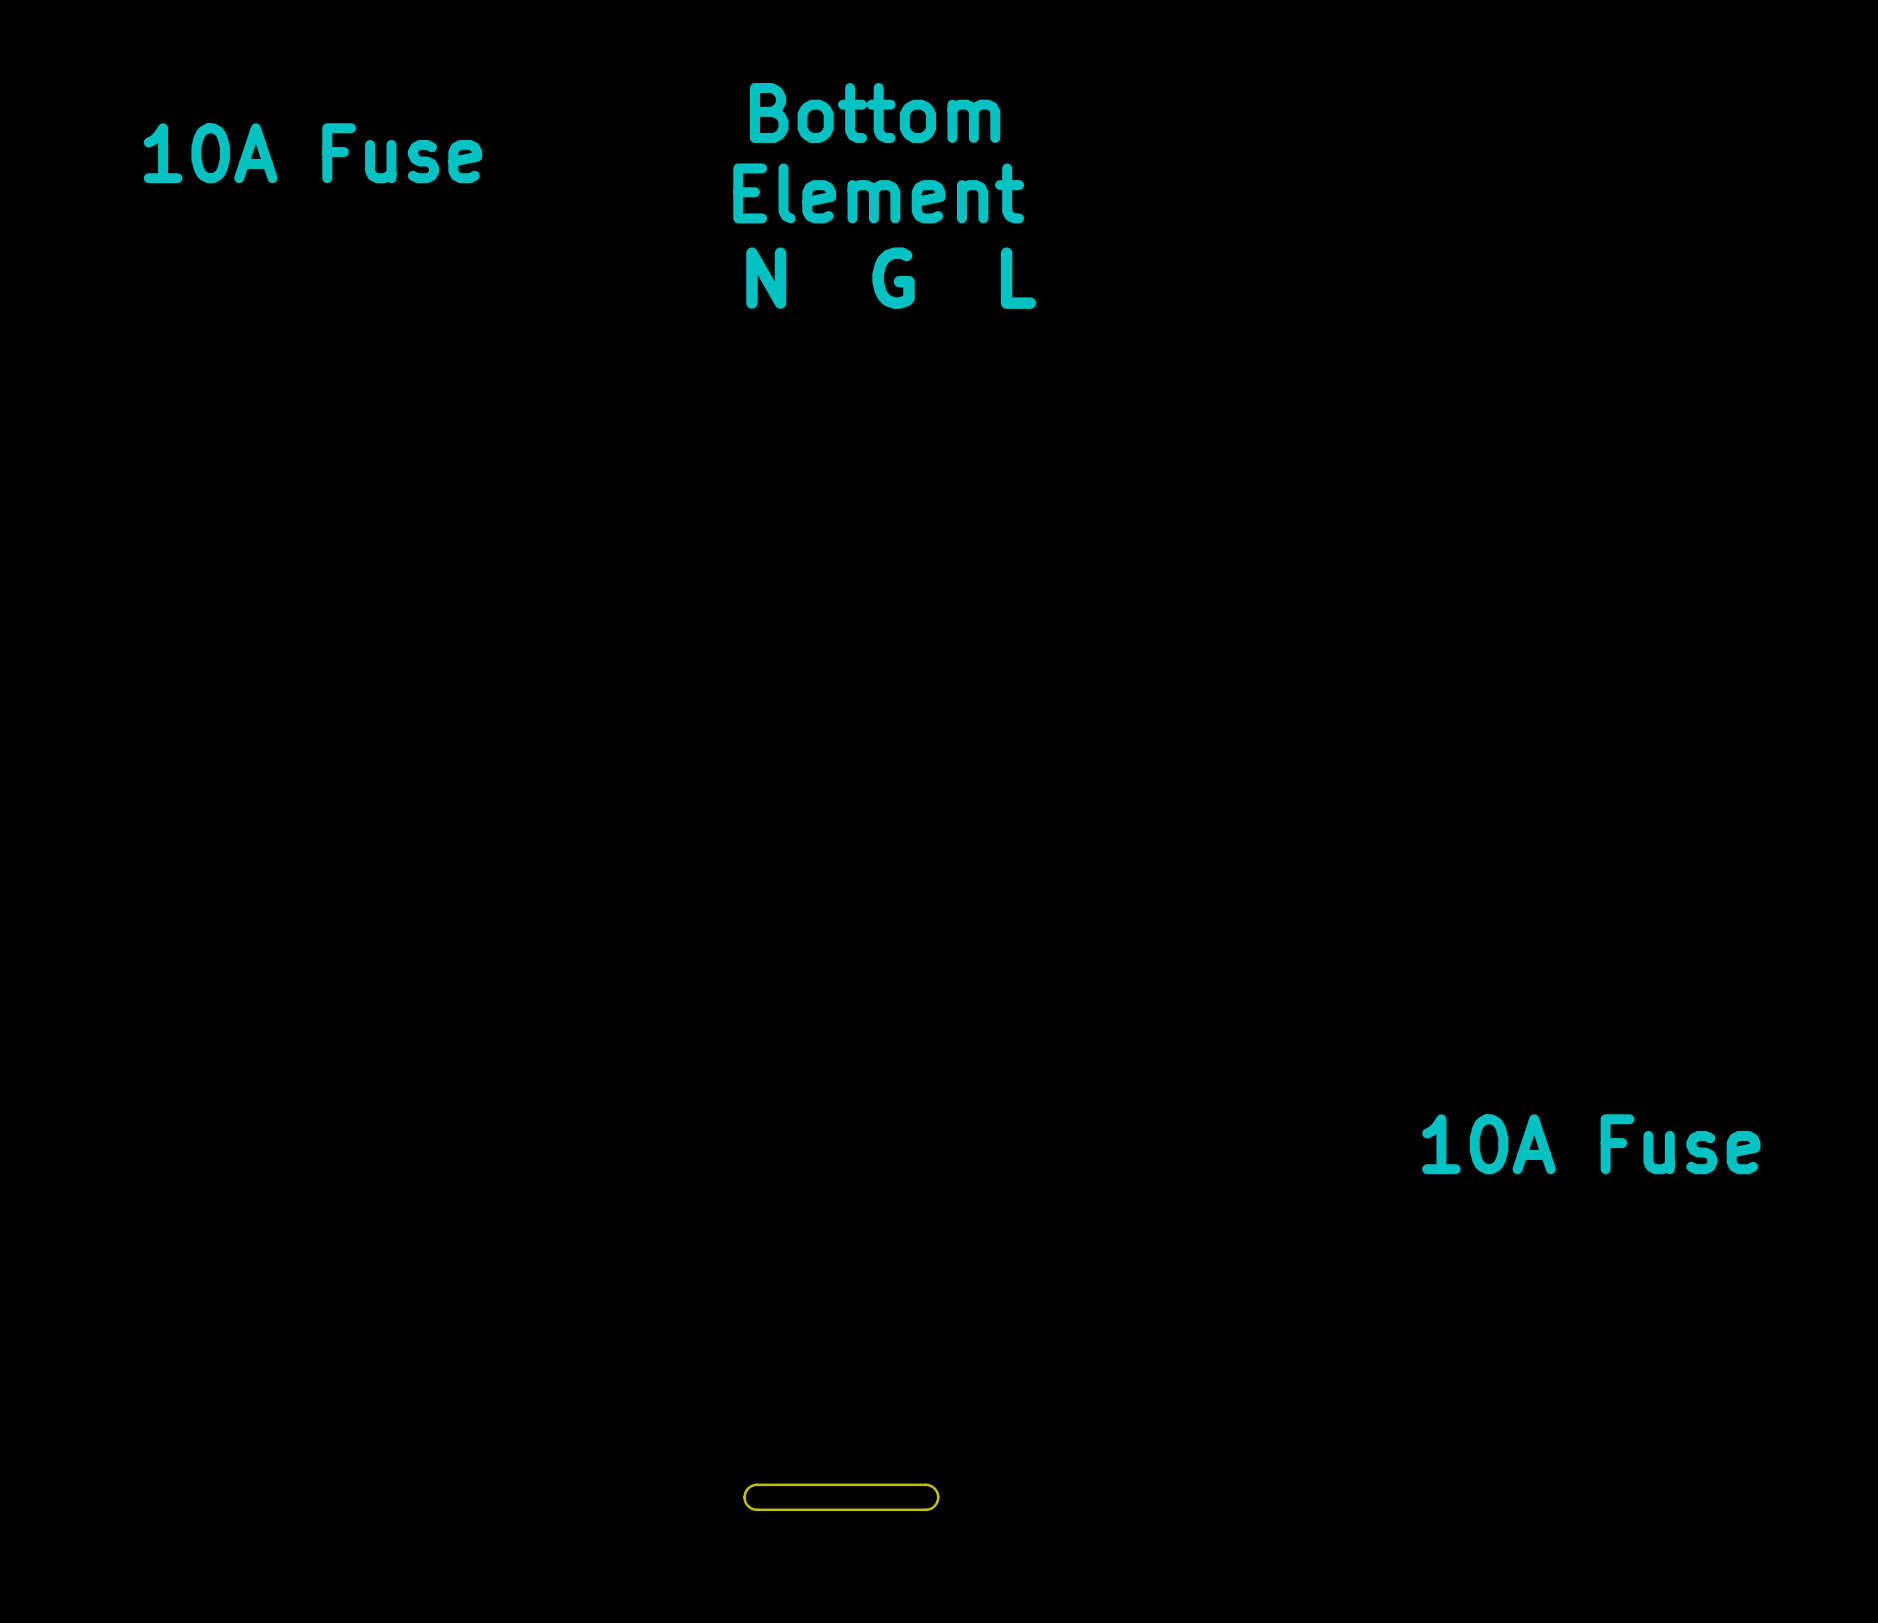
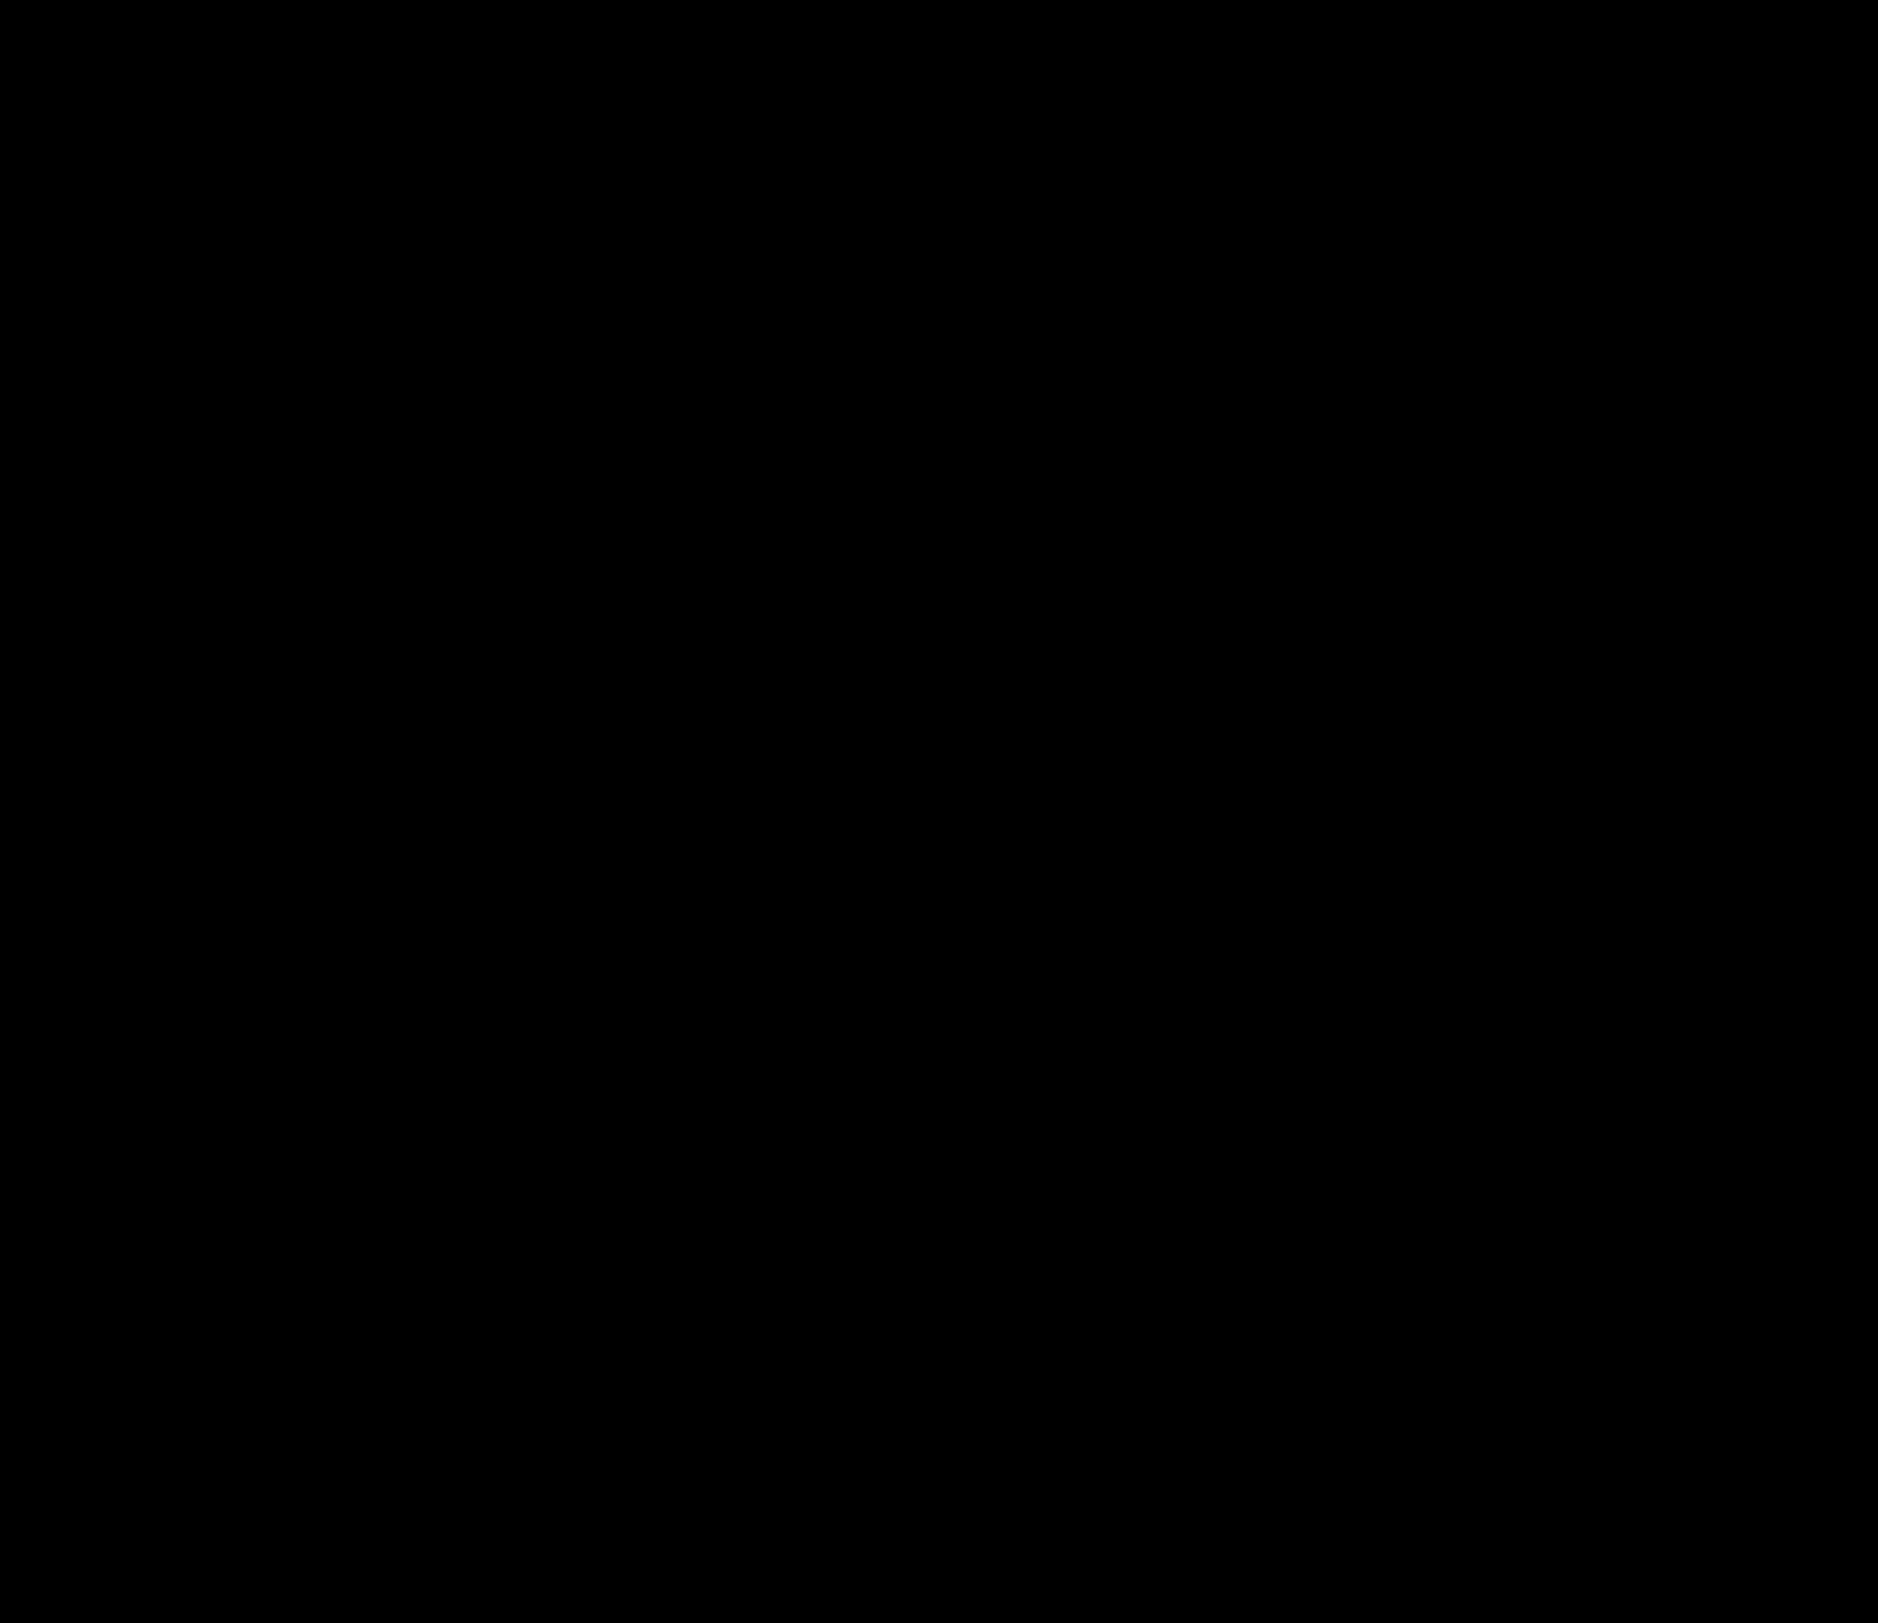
text: Bottom (875, 112) -> none
text: 10A Fuse (312, 153) -> none
text: Element (878, 193) -> none
text: N G L (891, 278) -> none
text: 10A Fuse (1591, 1144) -> none
board edge: (757, 1484) (927, 1484) (935, 1489) (938, 1498) (934, 1506) (925, 1509) (755, 1509) (748, 1506) (744, 1497) (748, 1488) (757, 1484) -> none

